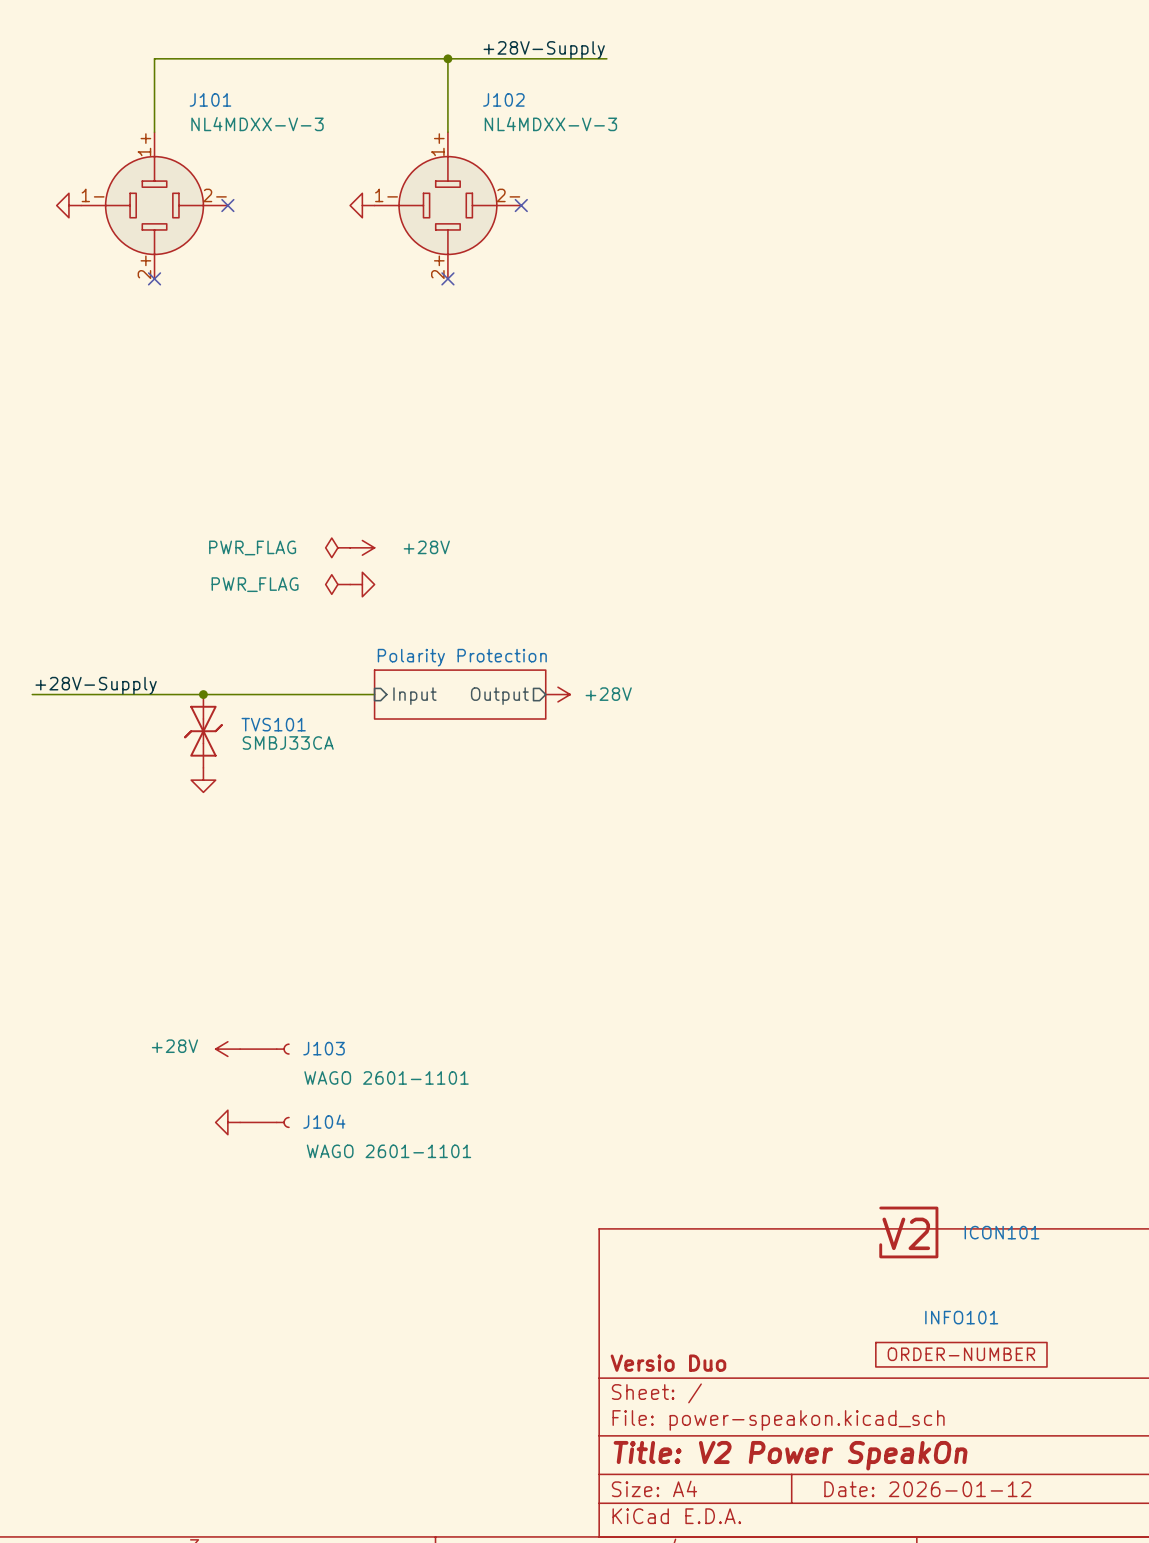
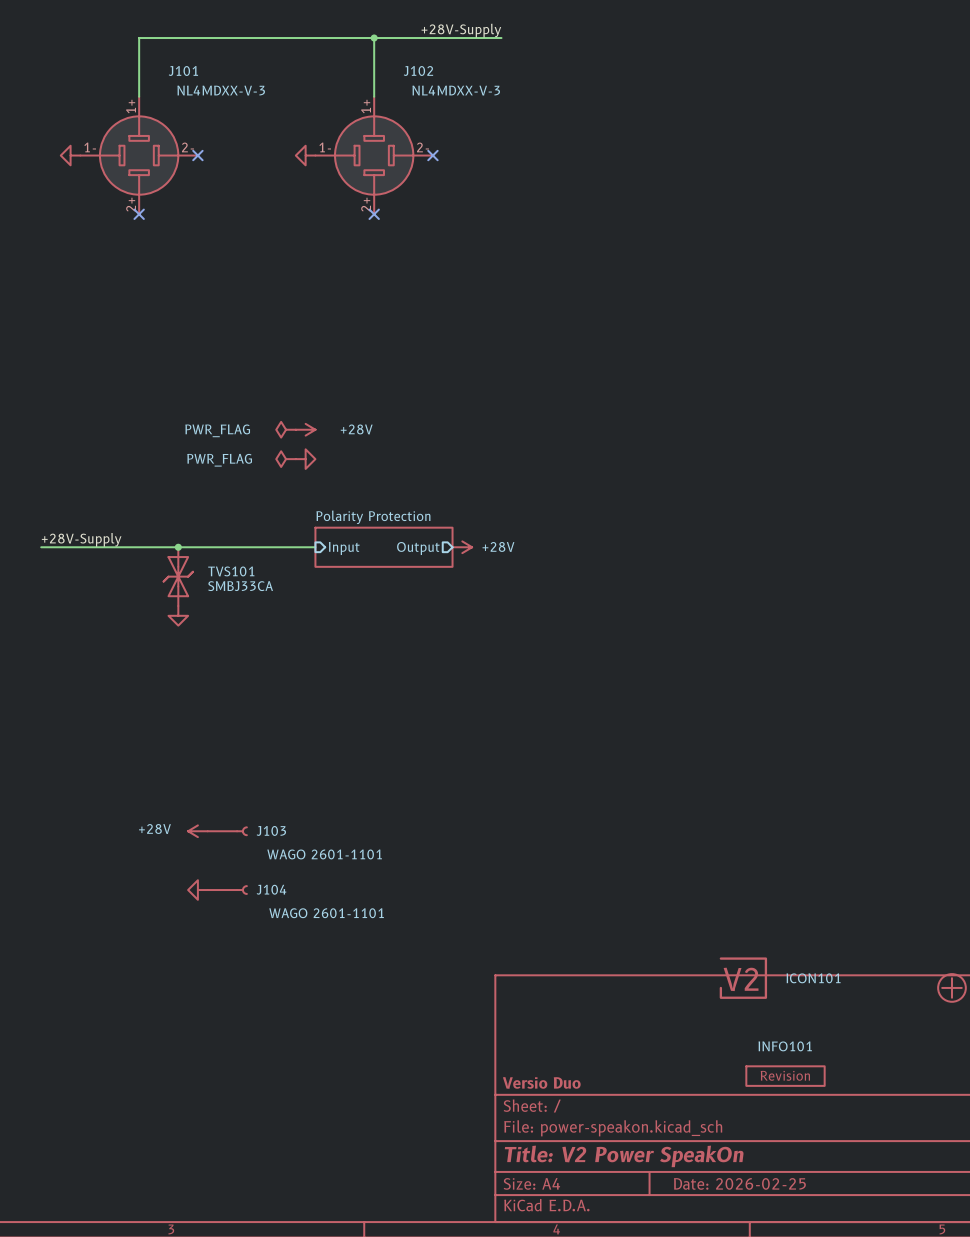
INFO101 symbol: [875, 1342, 1047, 1367] -> [746, 1066, 825, 1086]
title block: Date: 2026-01-12 (927, 1489) -> Date: 2026-02-25 (739, 1183)

